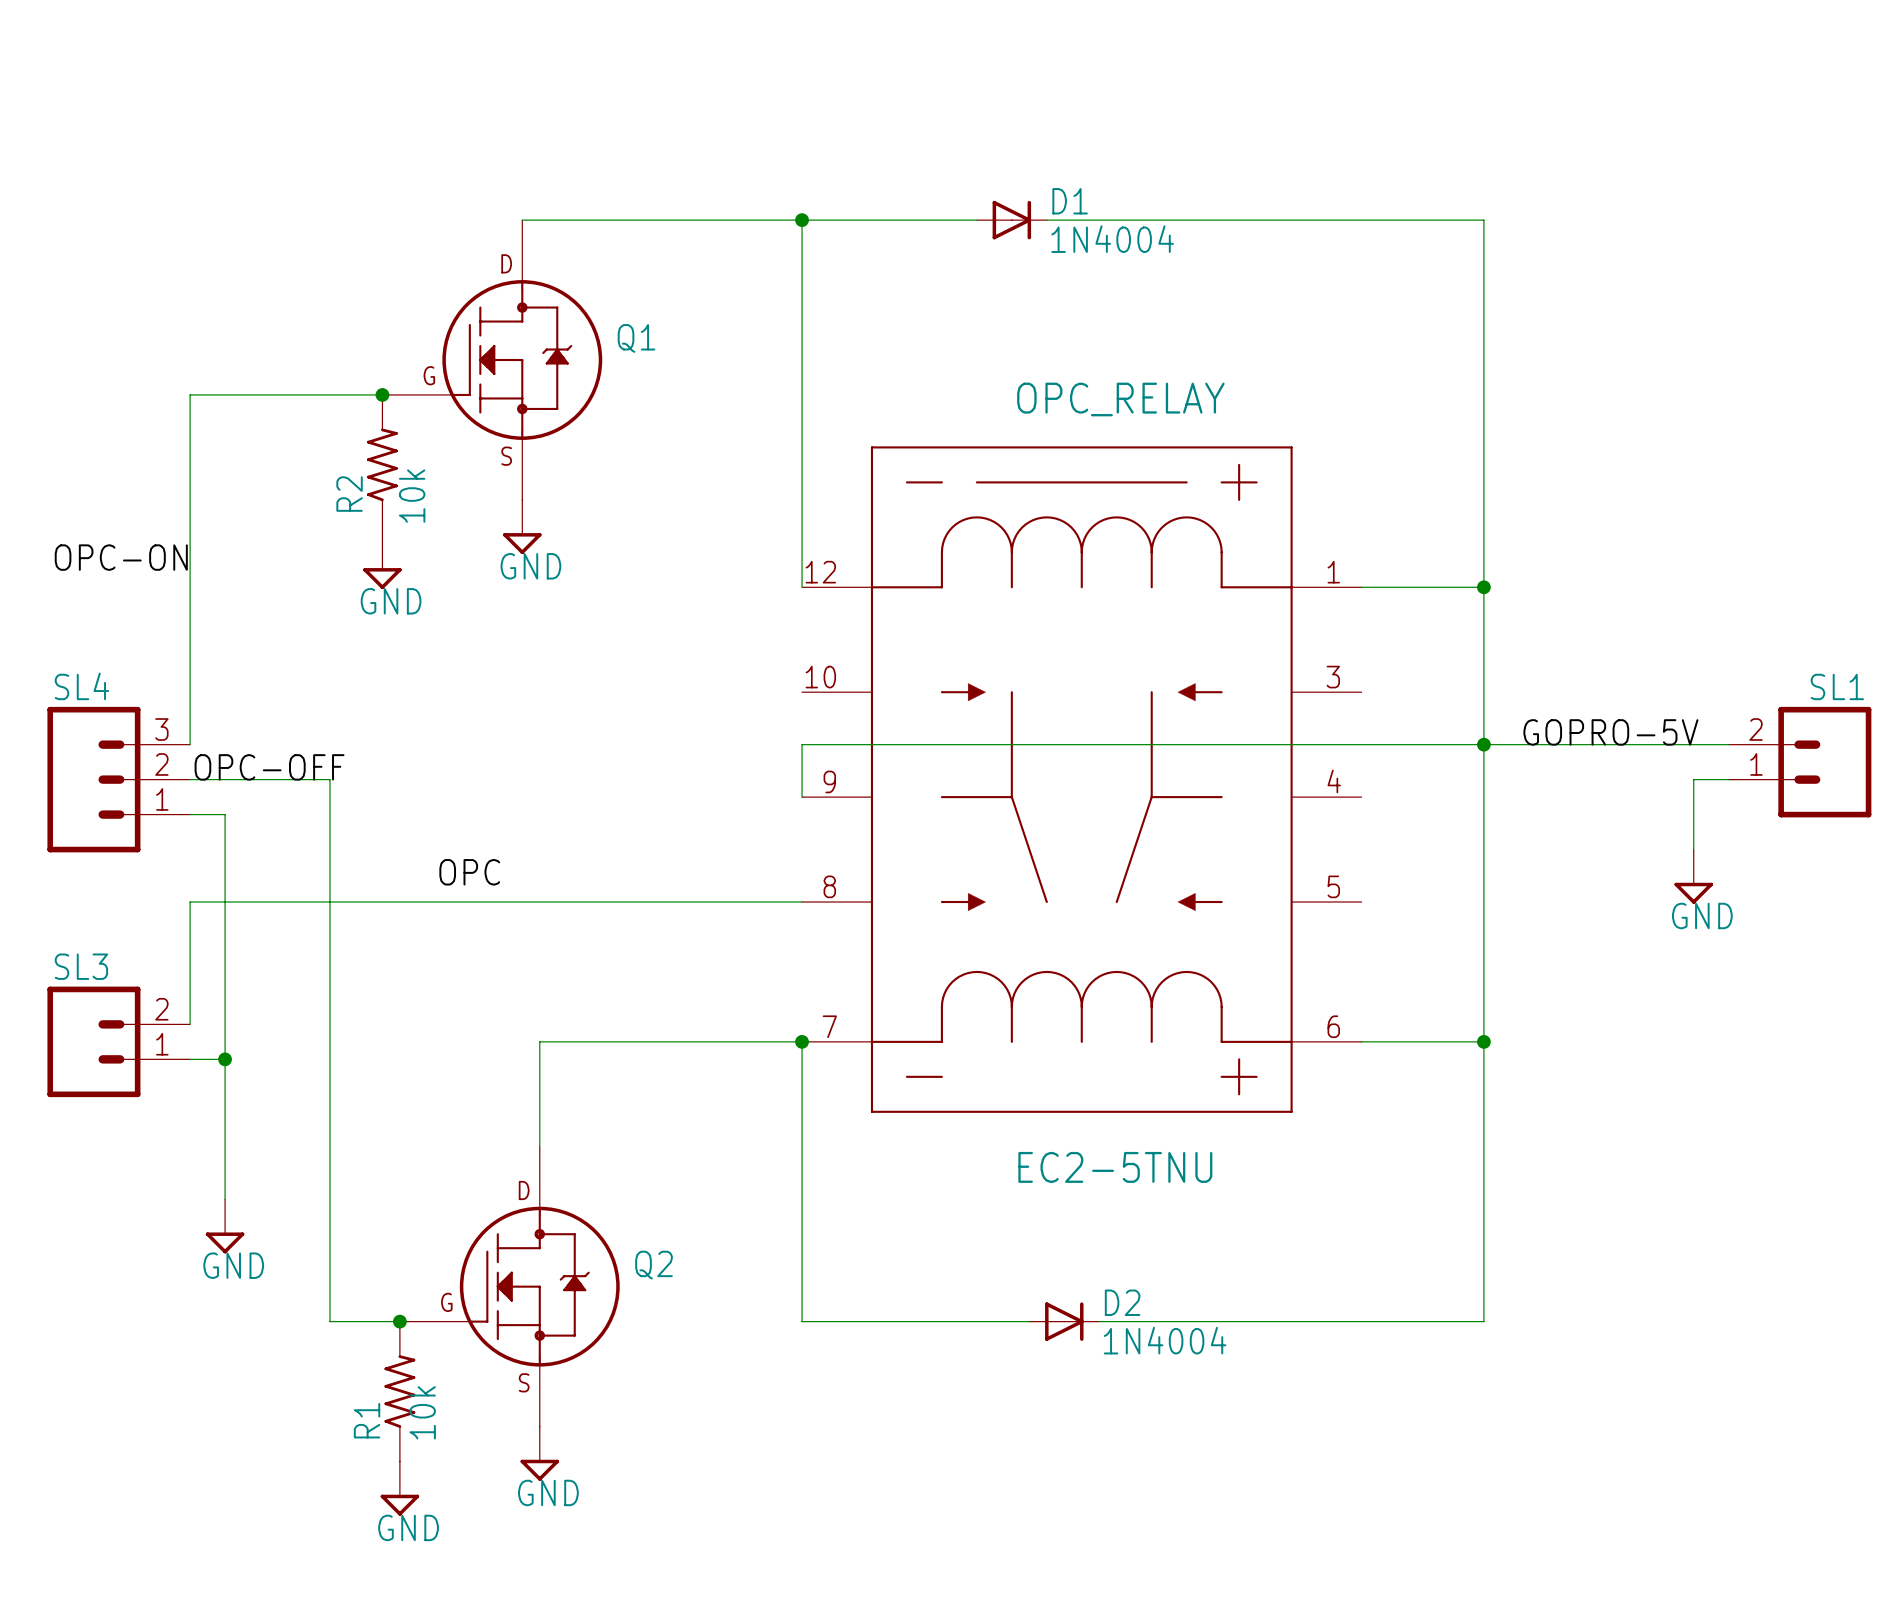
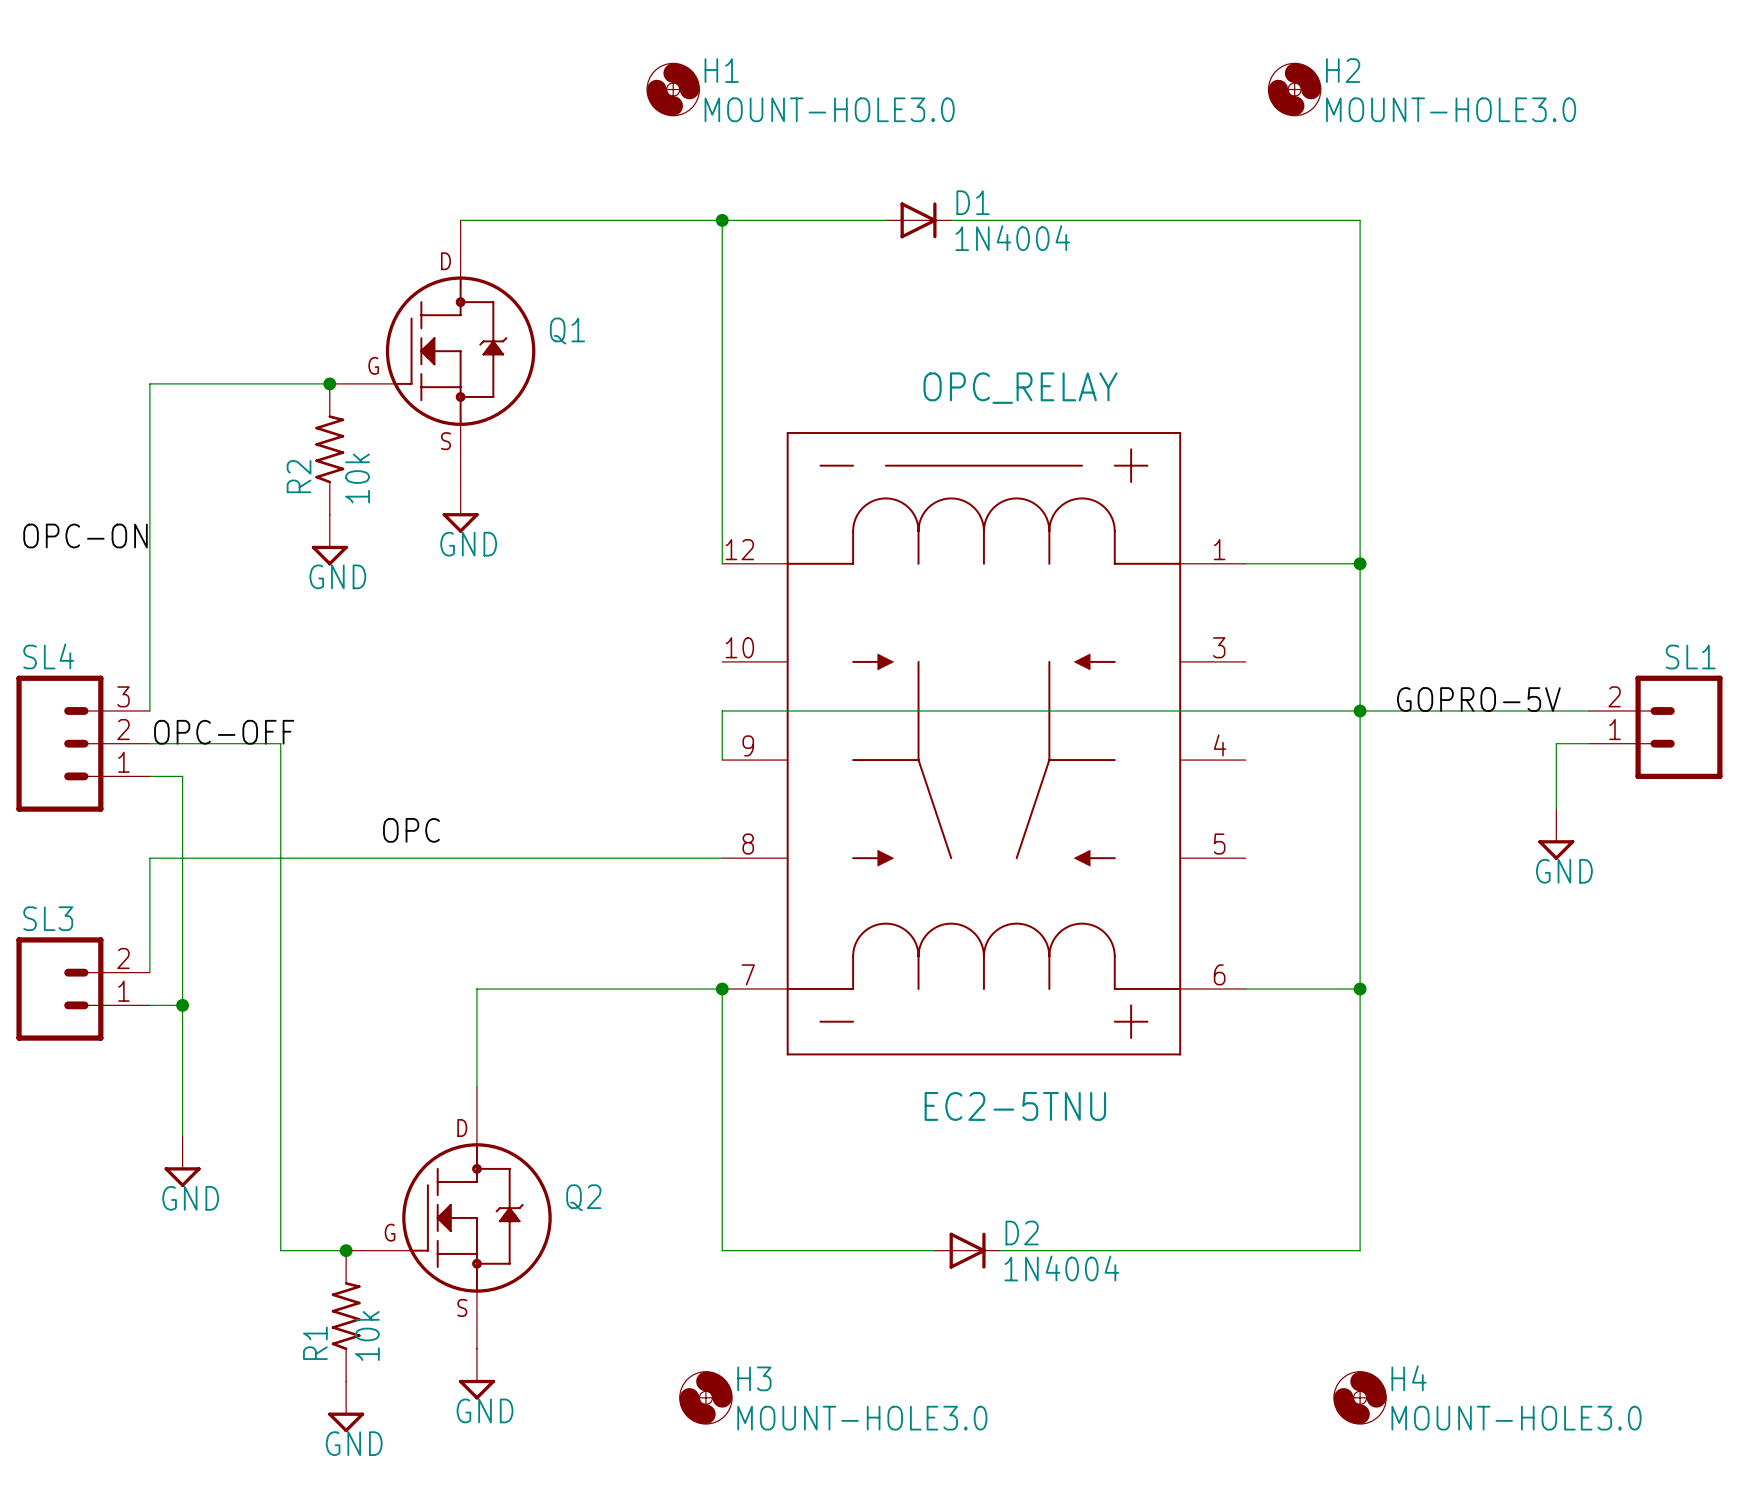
H1: none -> MOUNT-HOLE3.0 (673, 89)
H2: none -> MOUNT-HOLE3.0 (1294, 89)
H3: none -> MOUNT-HOLE3.0 (705, 1397)
H4: none -> MOUNT-HOLE3.0 (1360, 1397)

